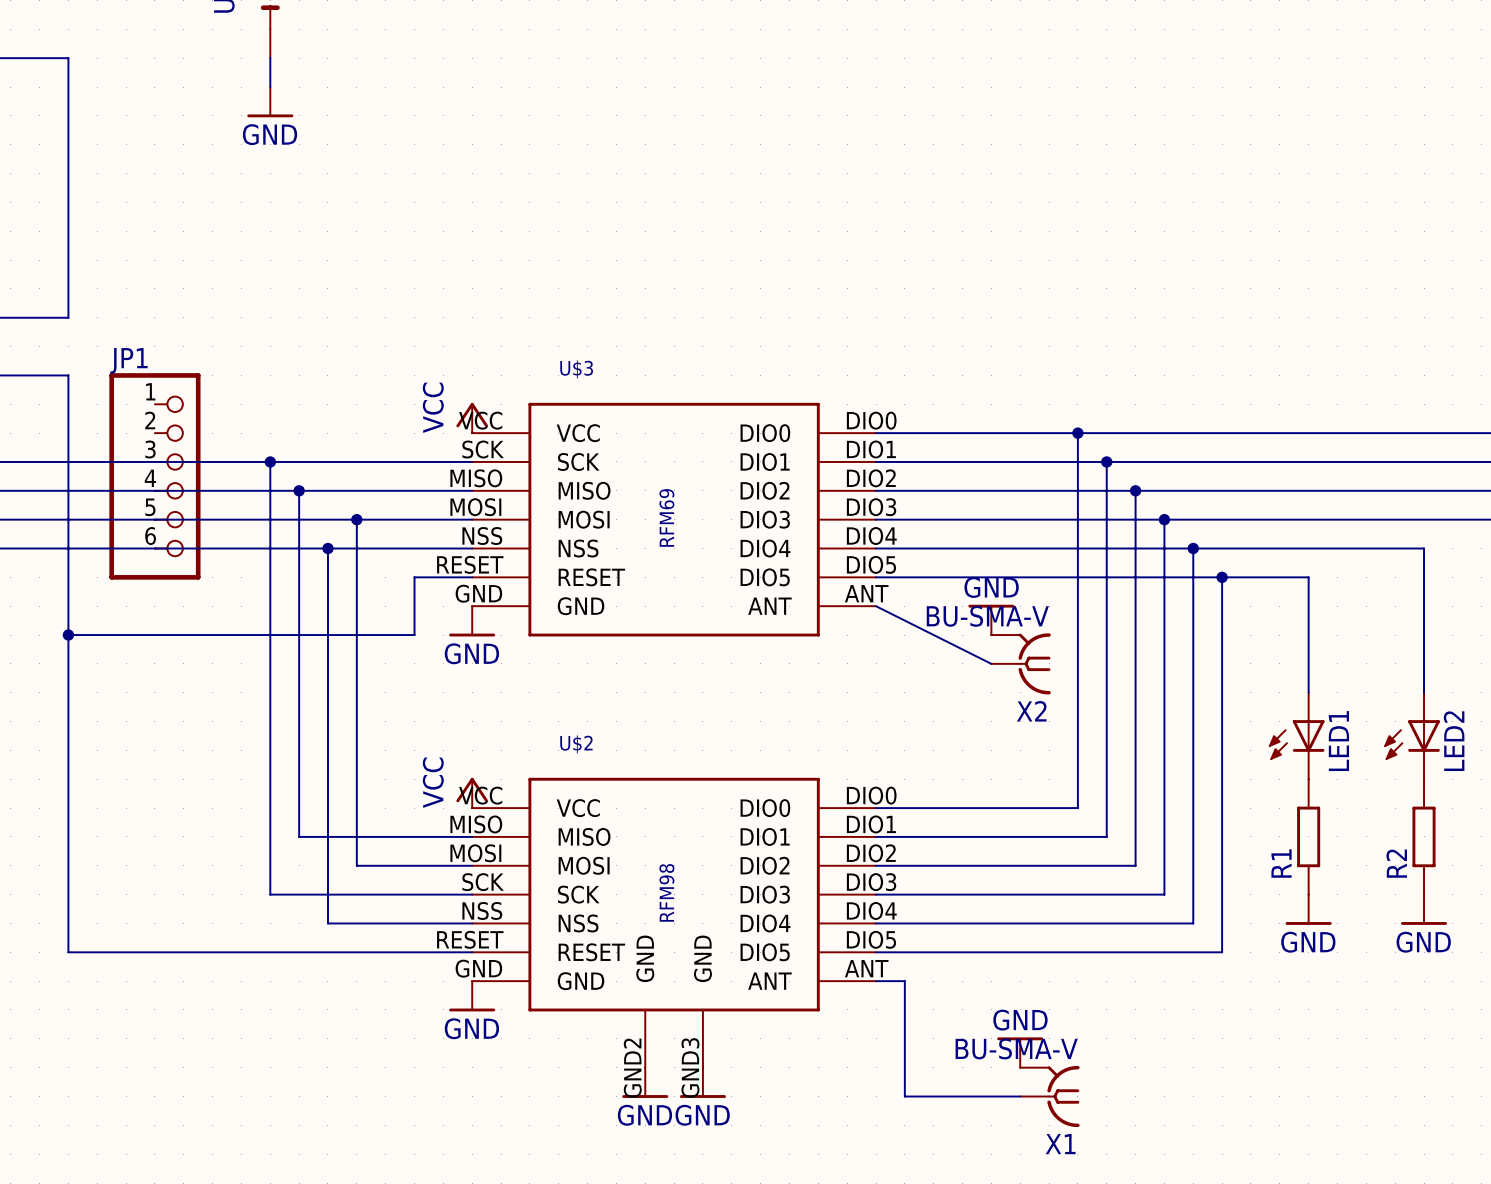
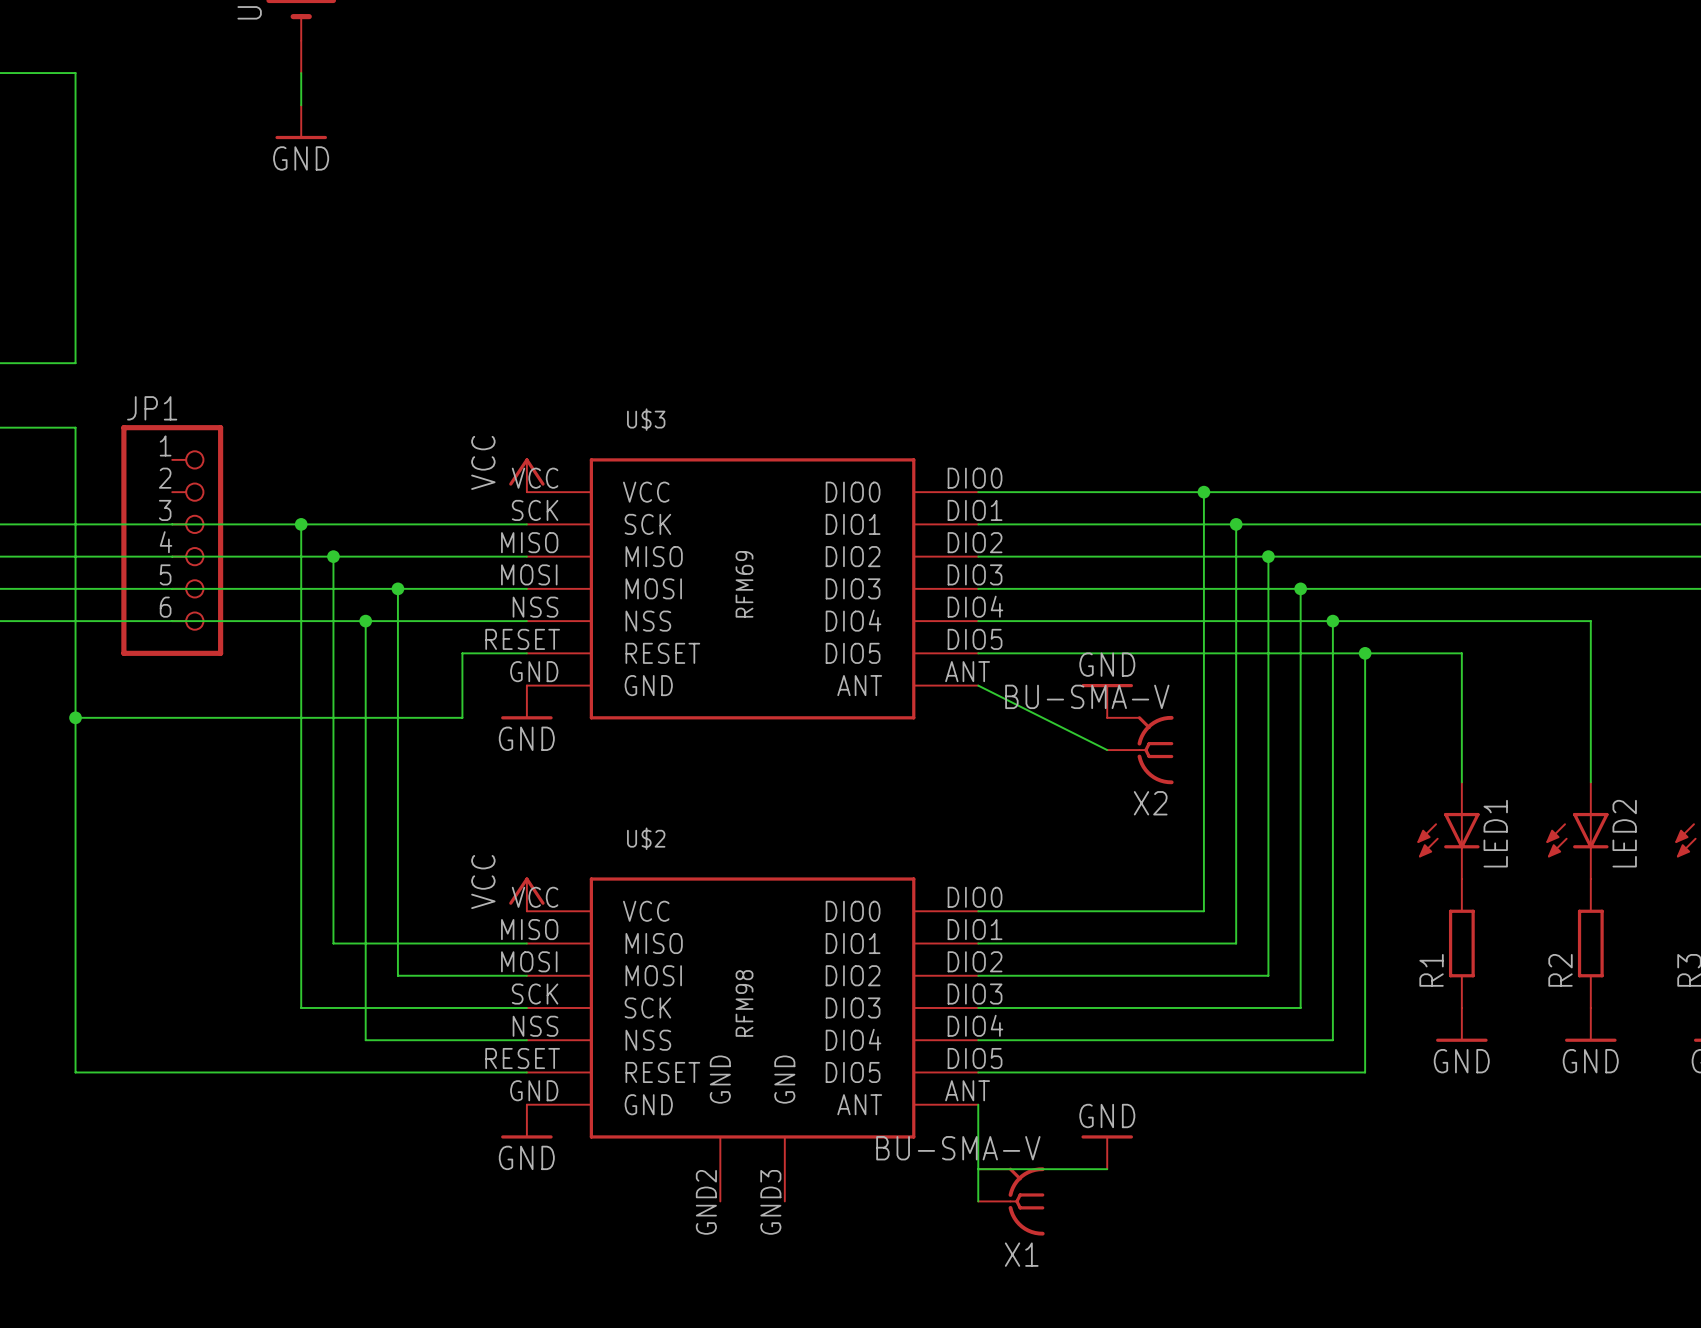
wire: (876, 981) (904, 981) (904, 1096) (1020, 1096) -> (978, 1104) (978, 1201)
wire: none -> (978, 1169) (1107, 1169)
power symbol position: GND (1020, 1052) -> GND (1107, 1152)
power symbol: GND (645, 1082) -> none
power symbol: GND (702, 1082) -> none
X1 position: (1049, 1096) -> (1011, 1201)

